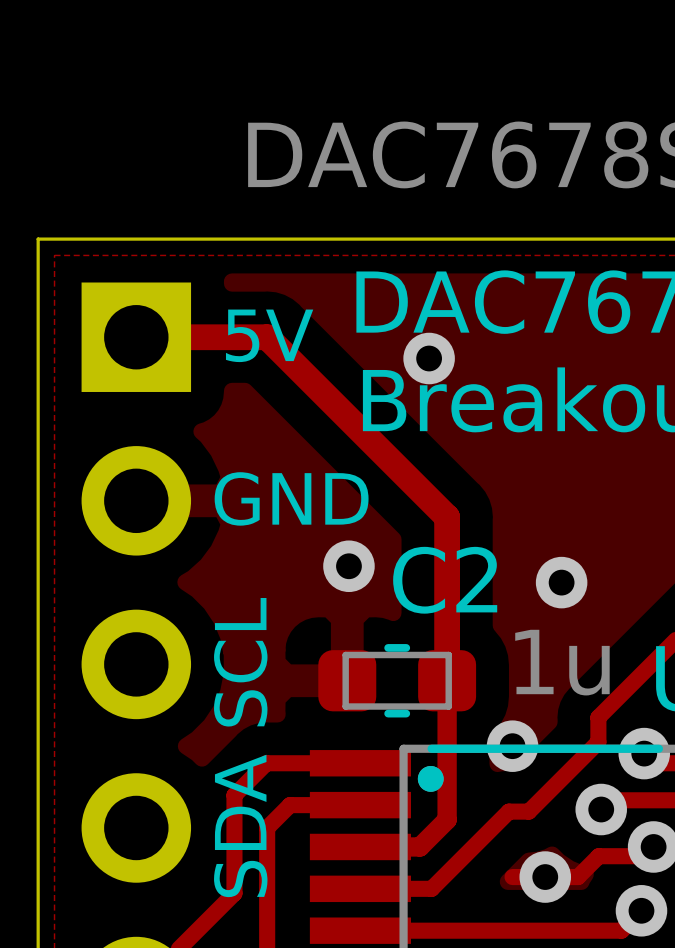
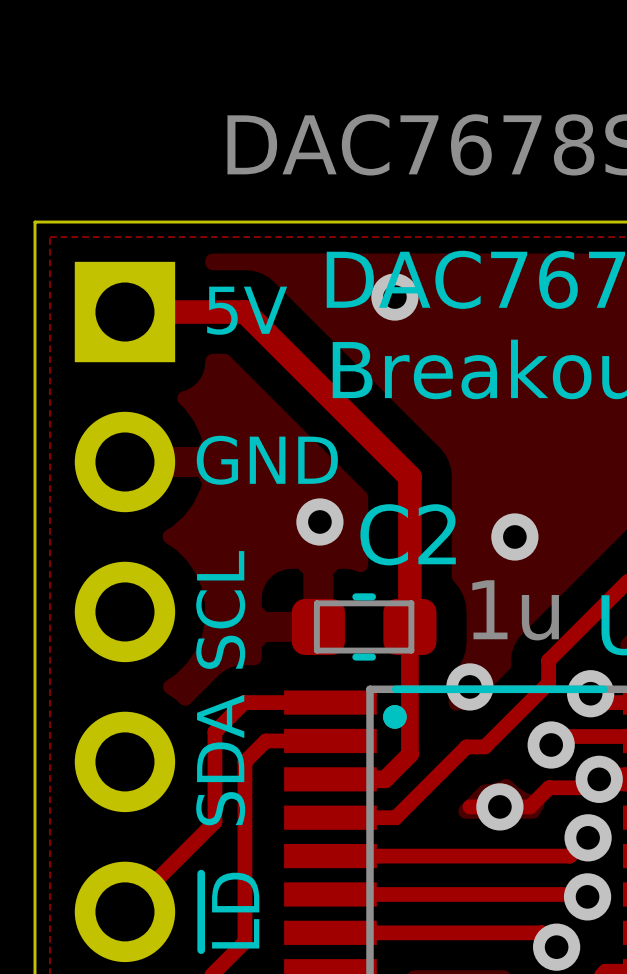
via position: (429, 358) -> (394, 297)

